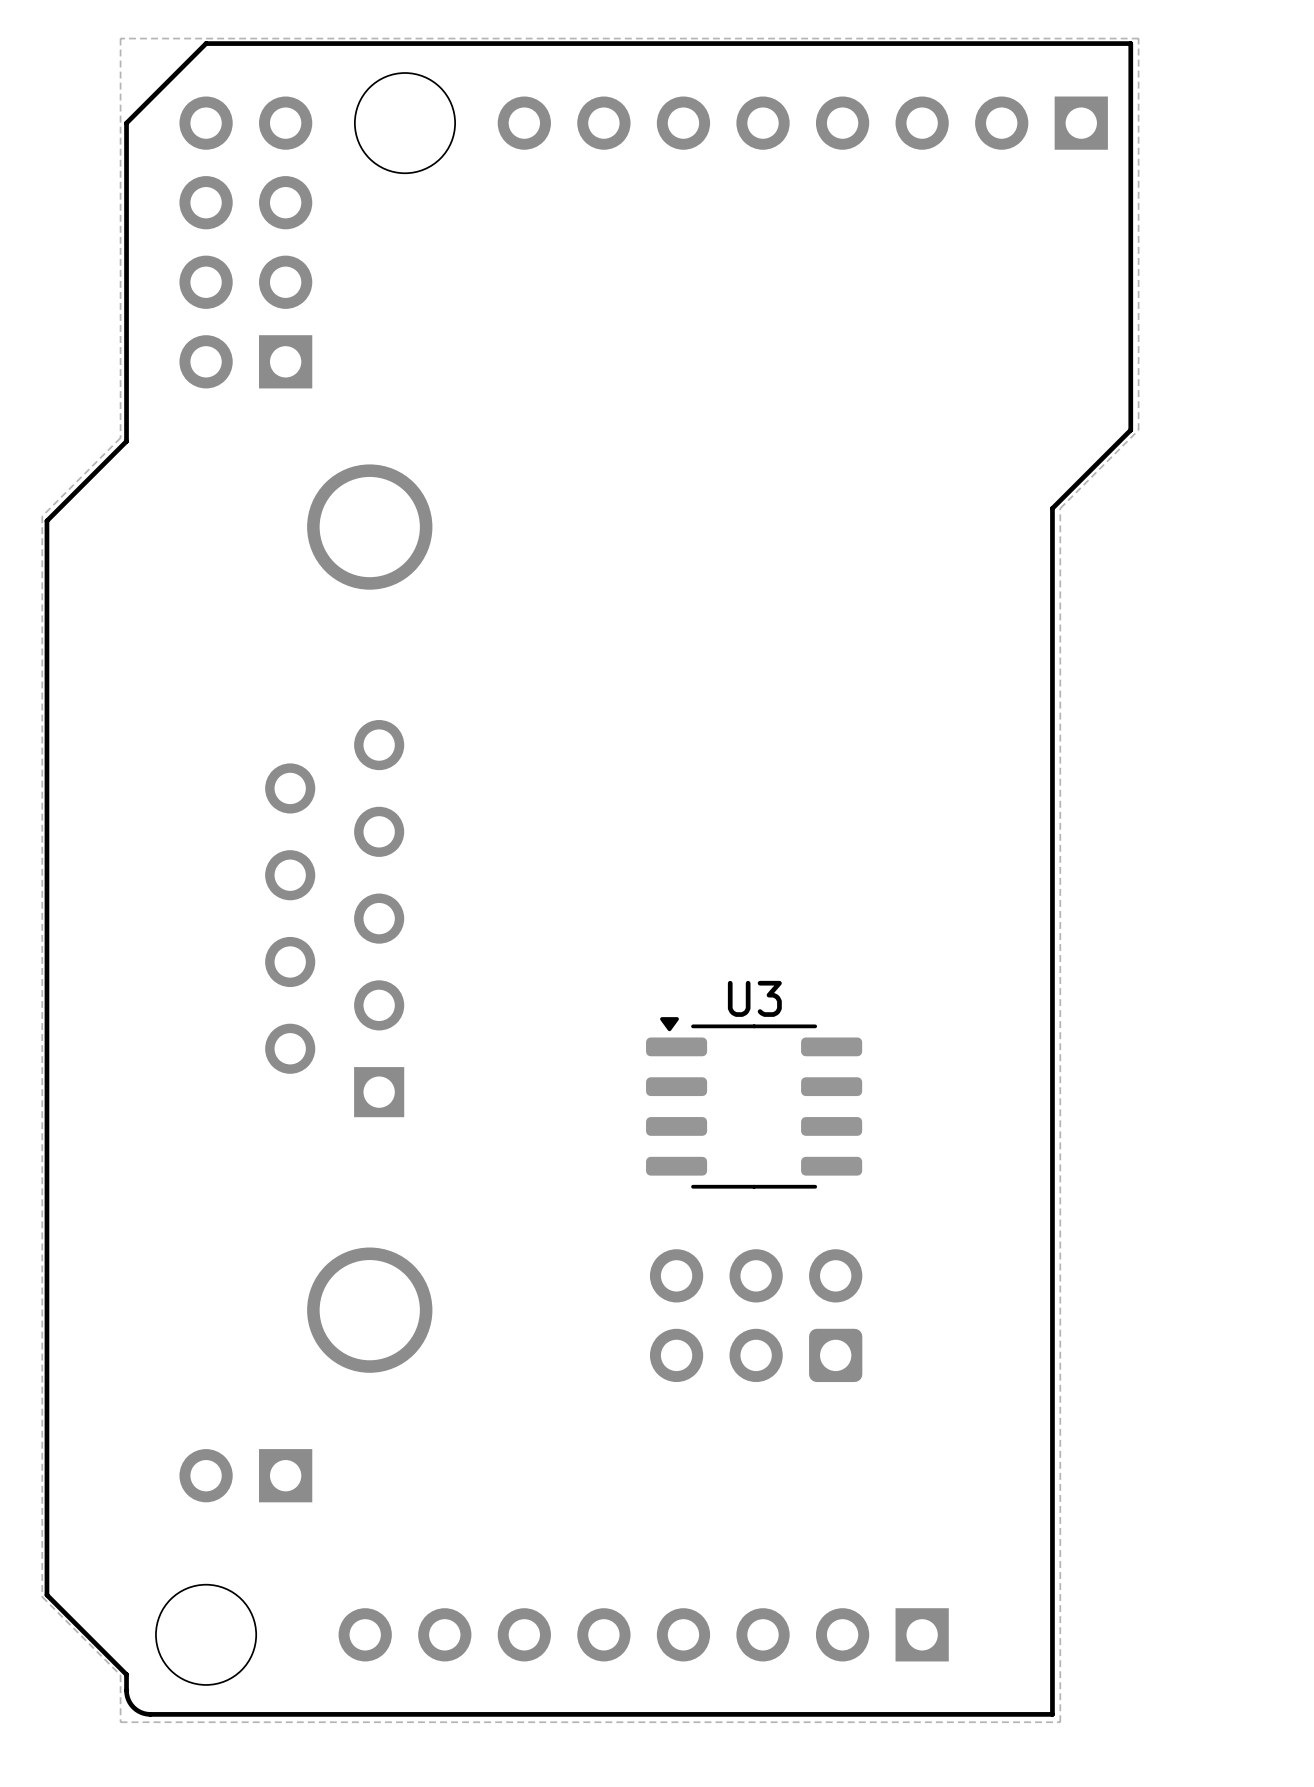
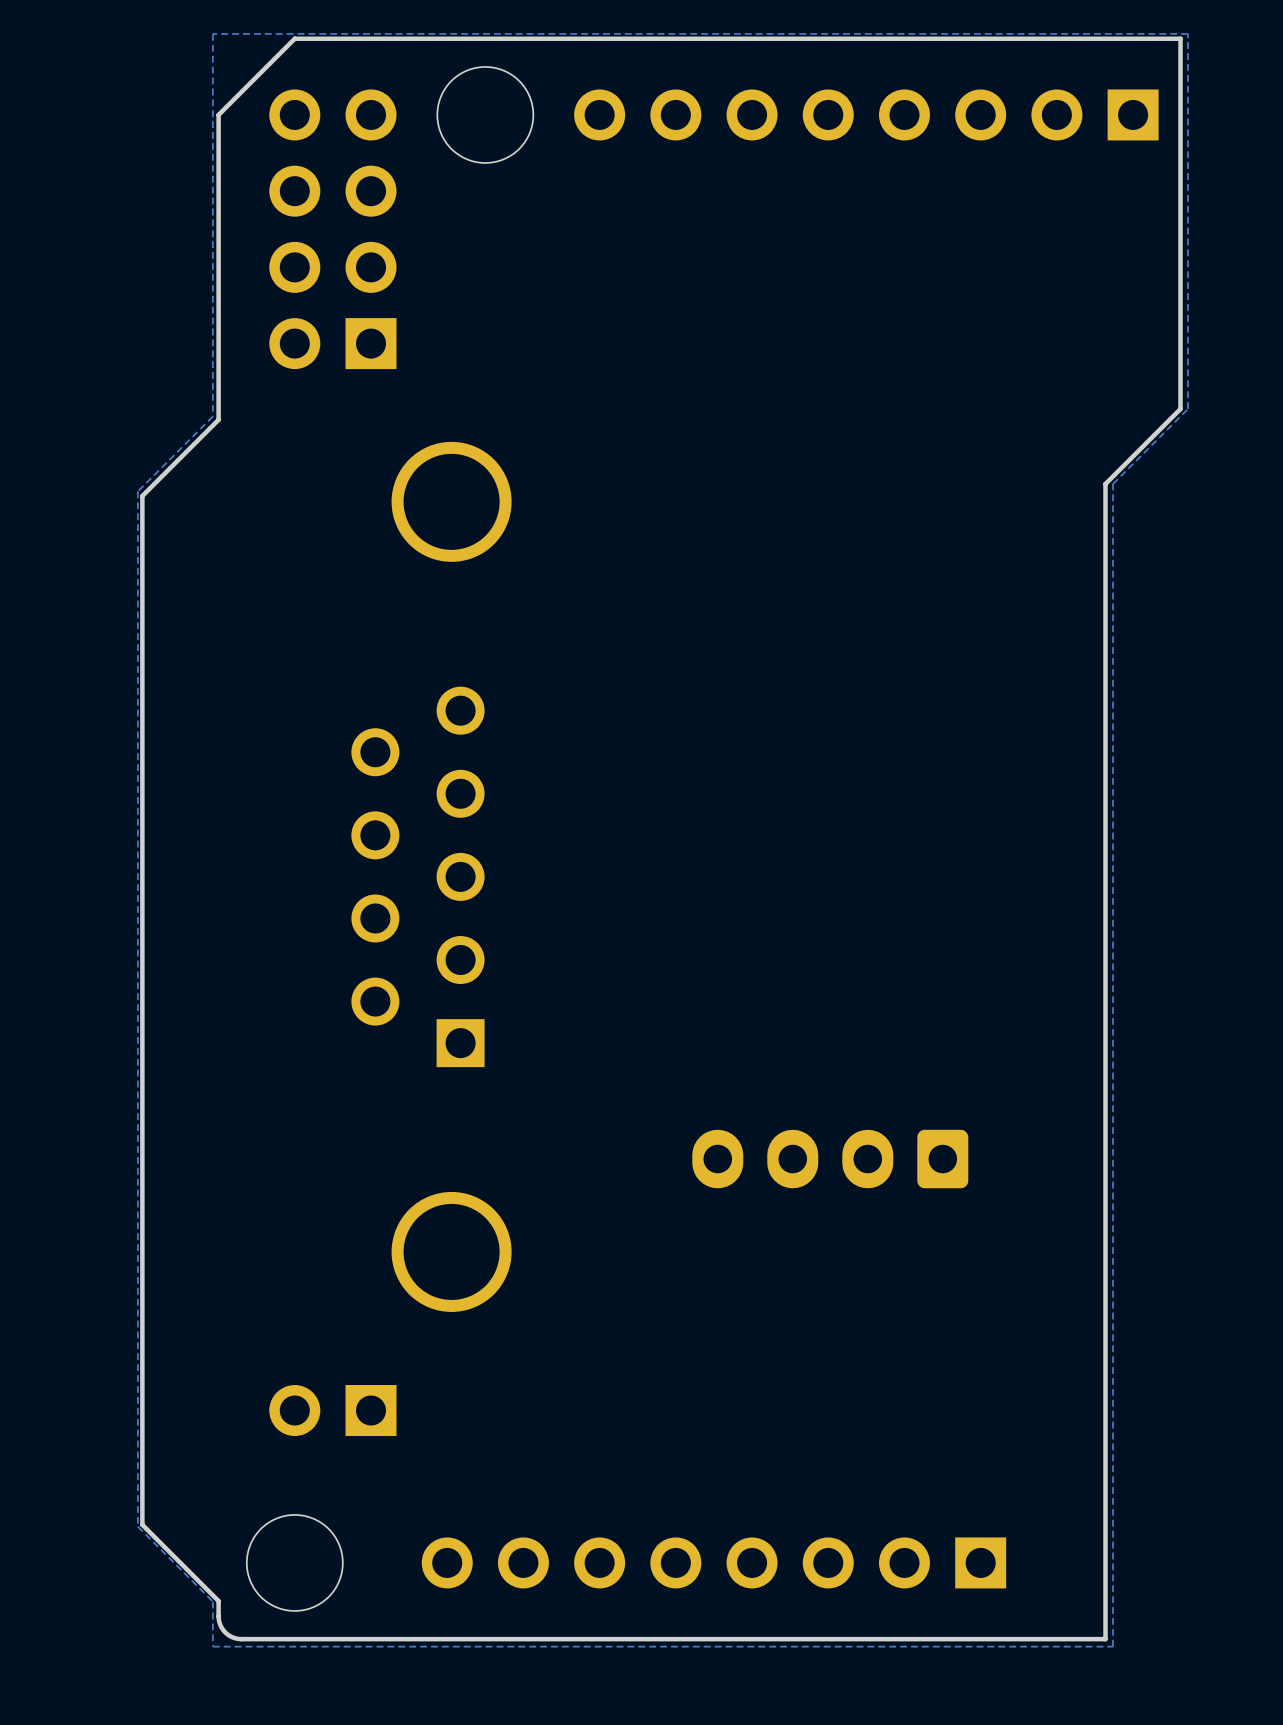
U3: (754, 1102) -> none
part: none -> (830, 1159)
part: (756, 1315) -> none

